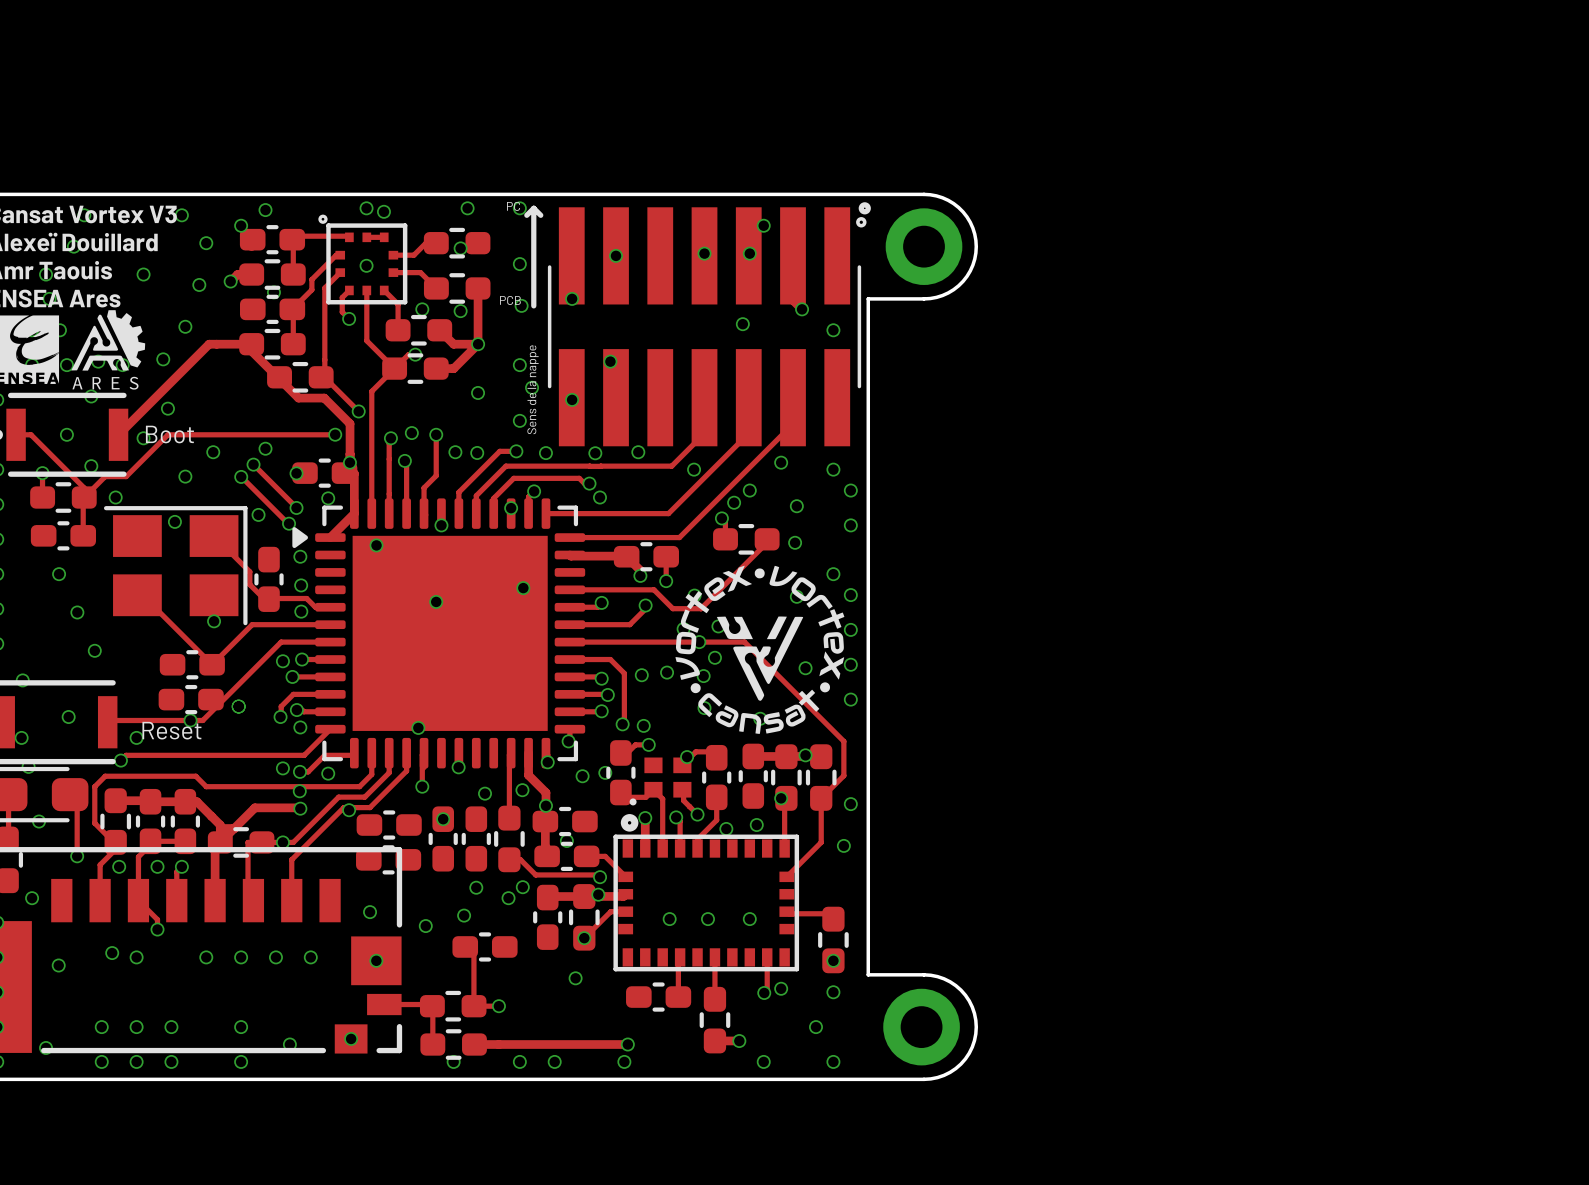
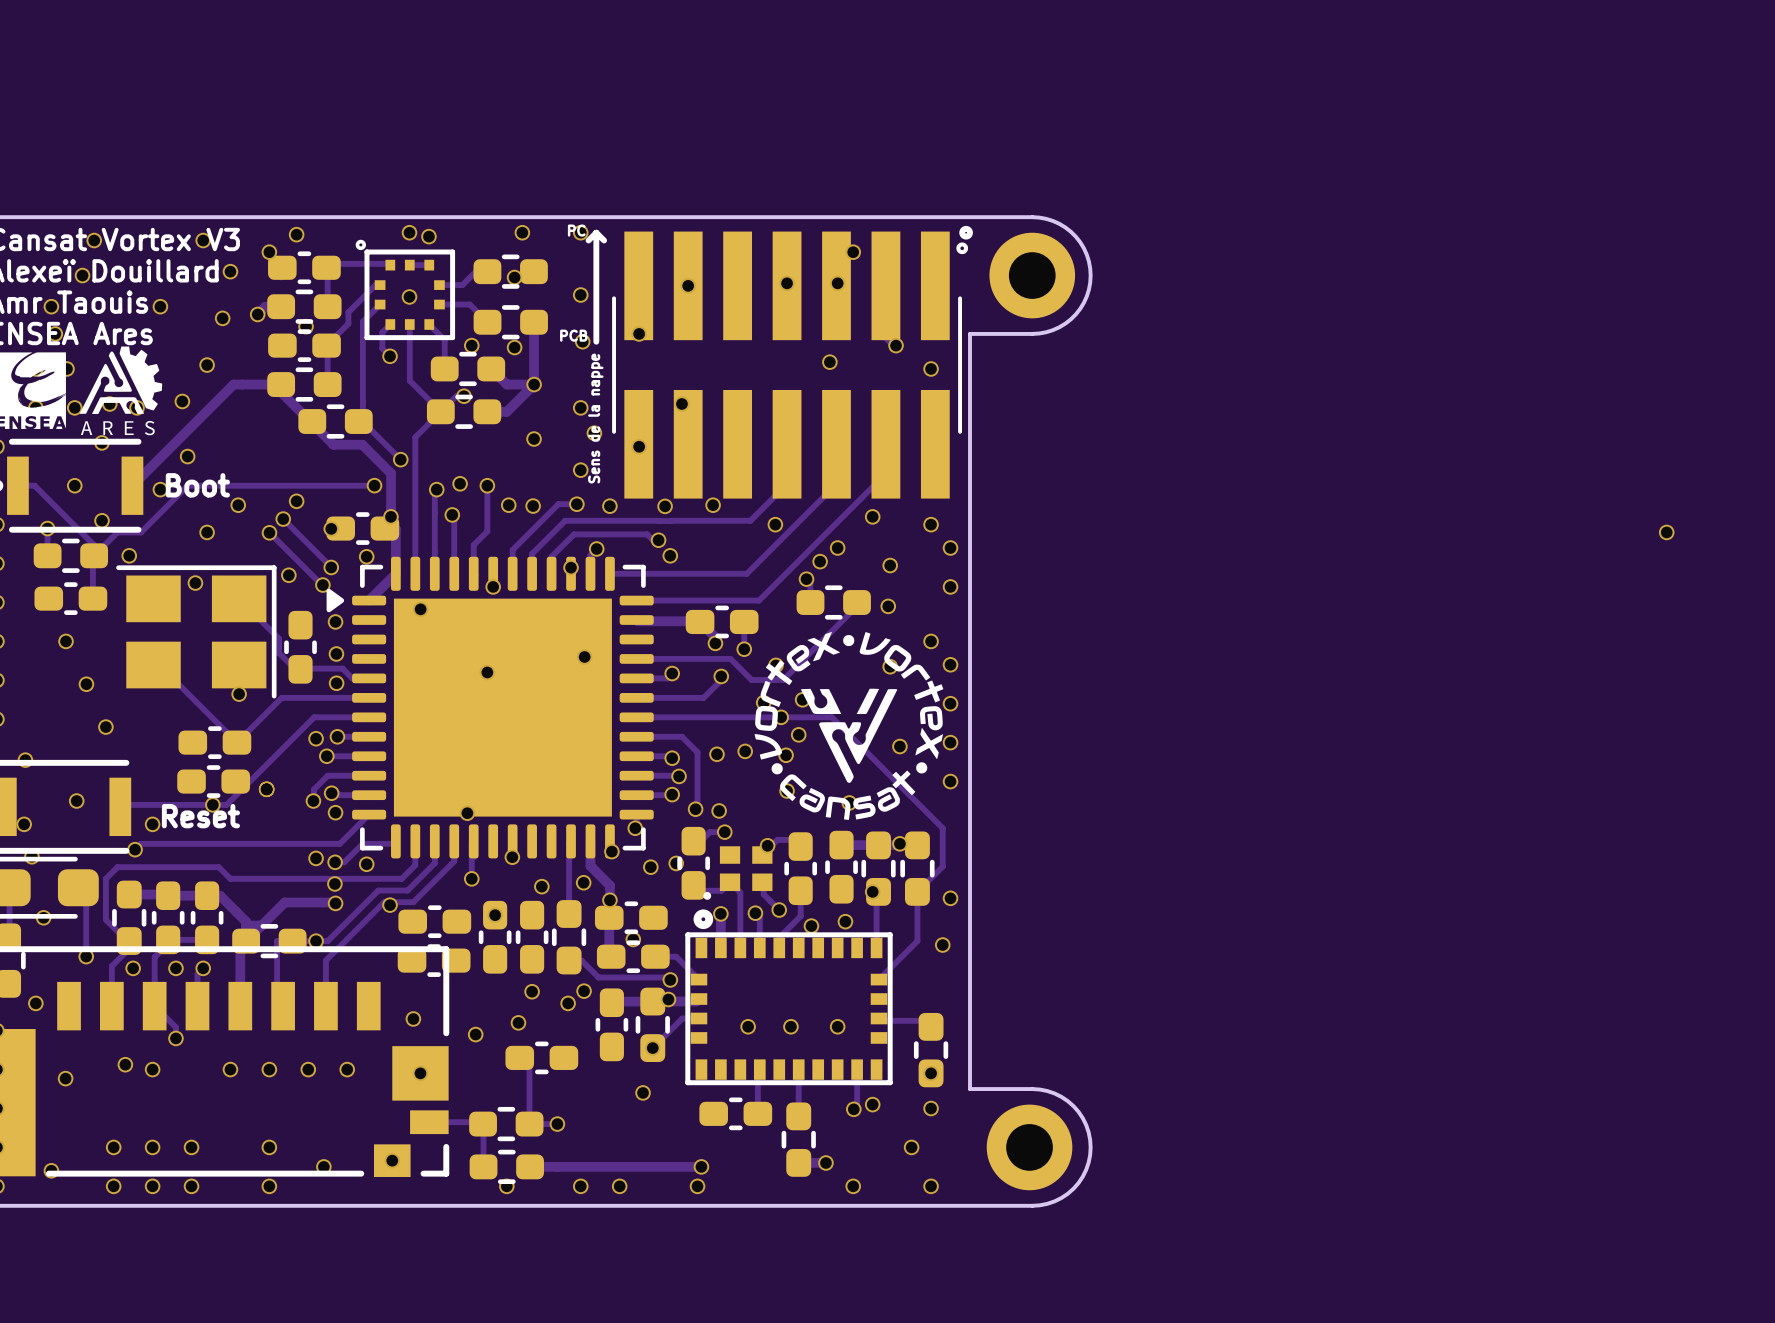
via: none -> (1666, 532)

